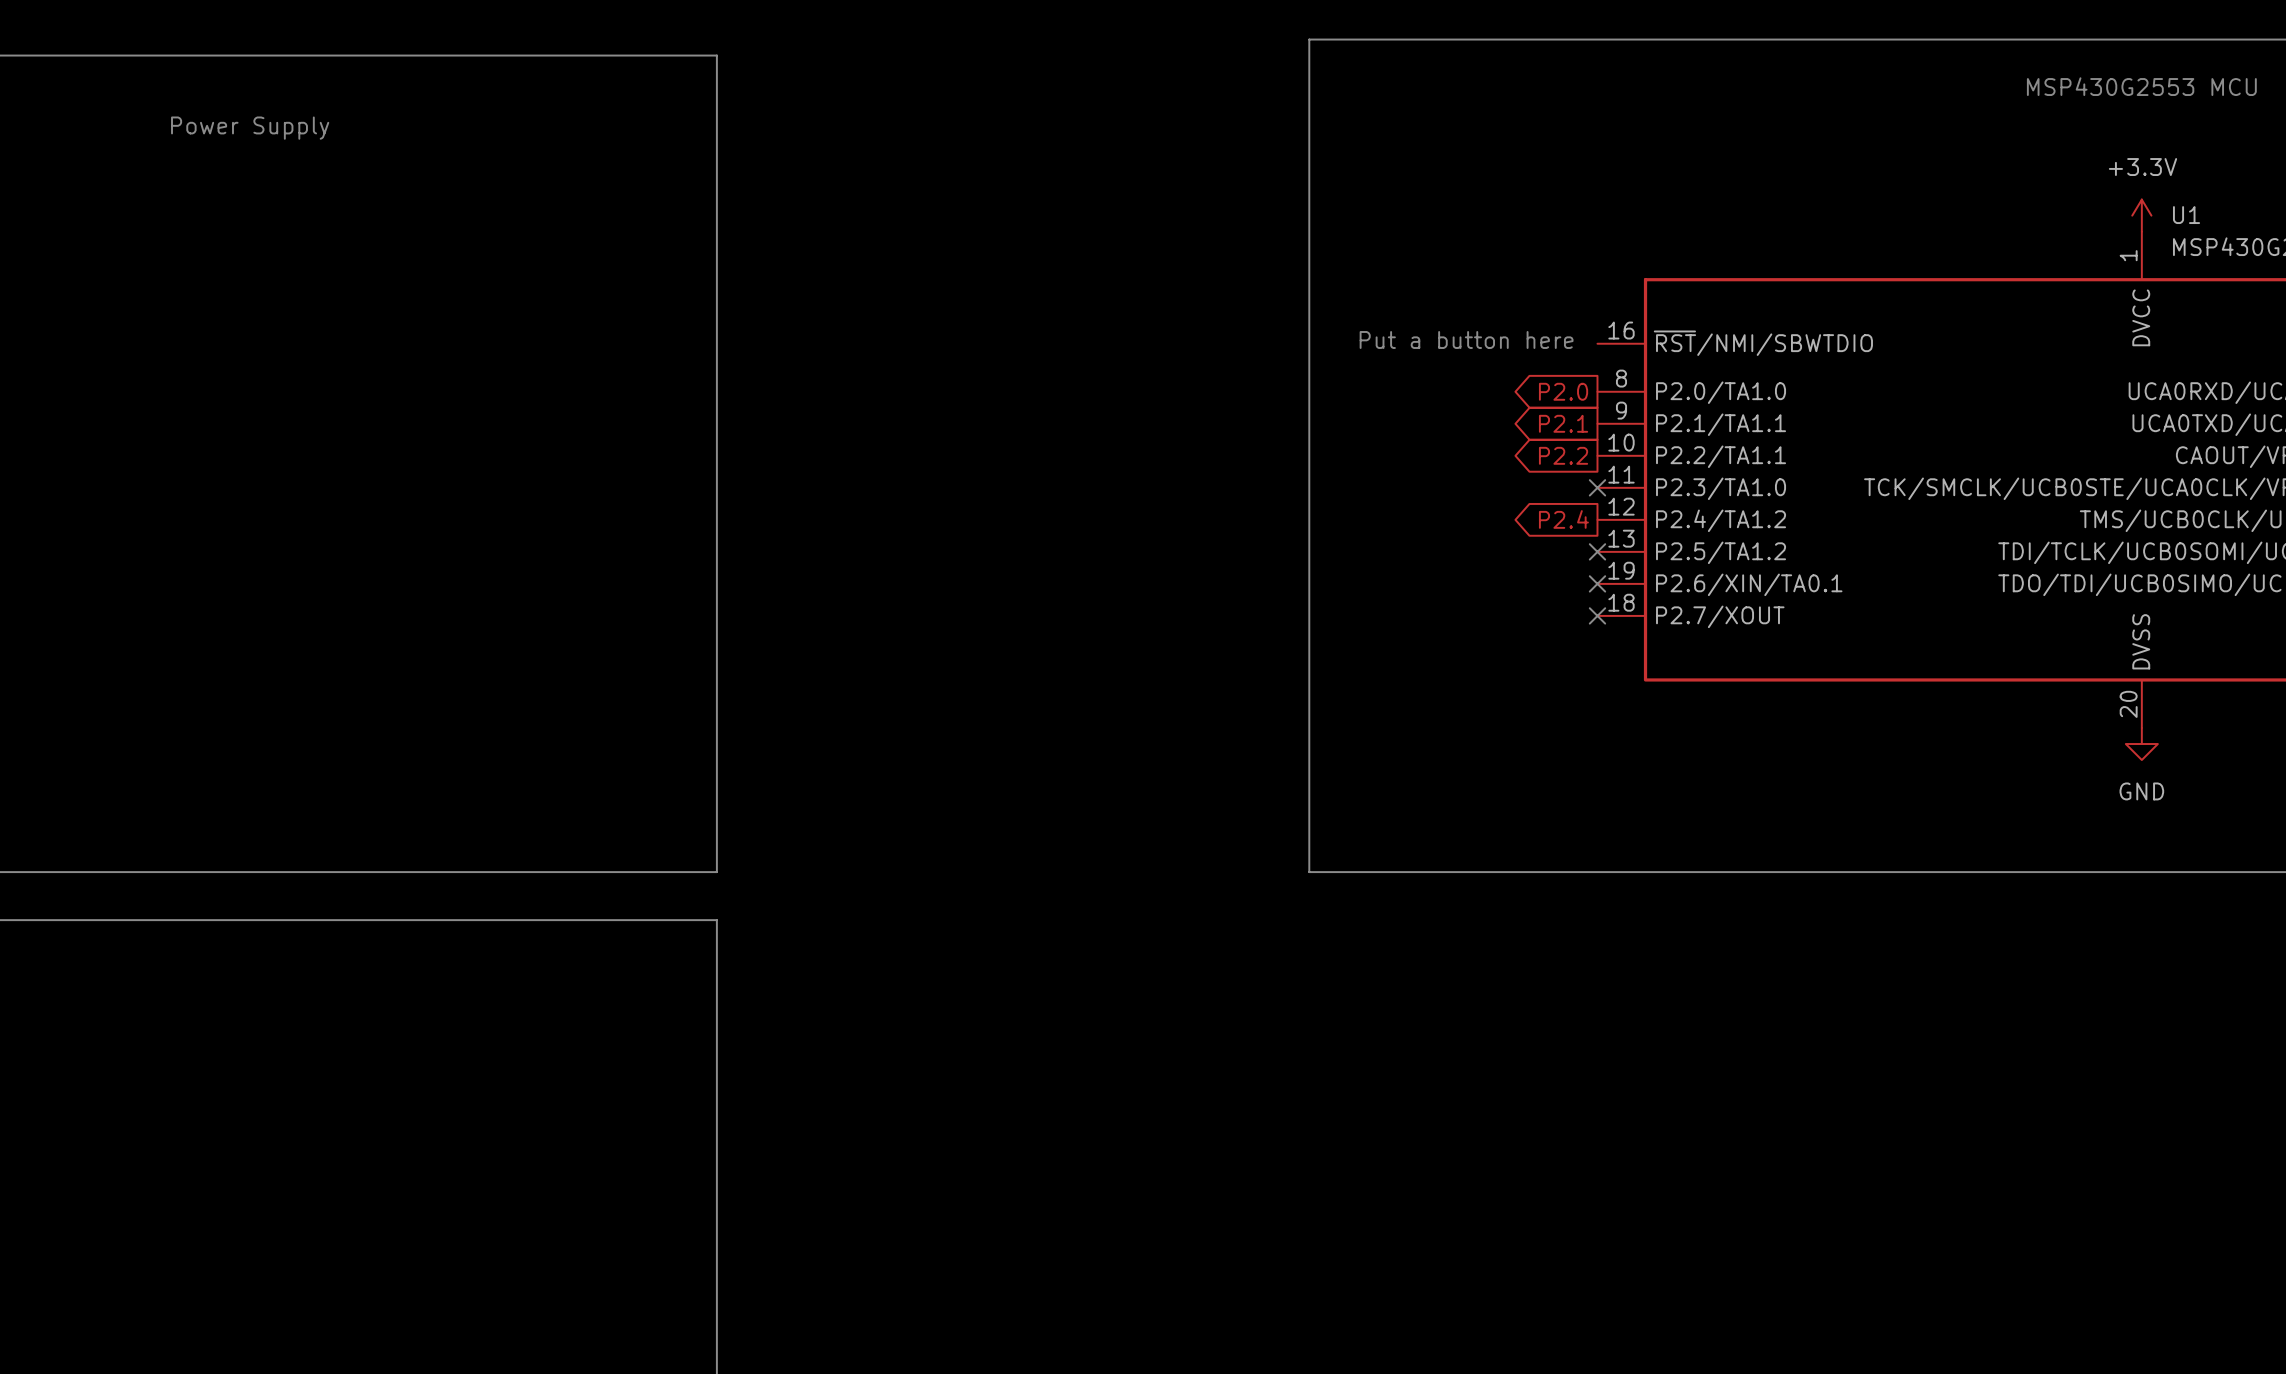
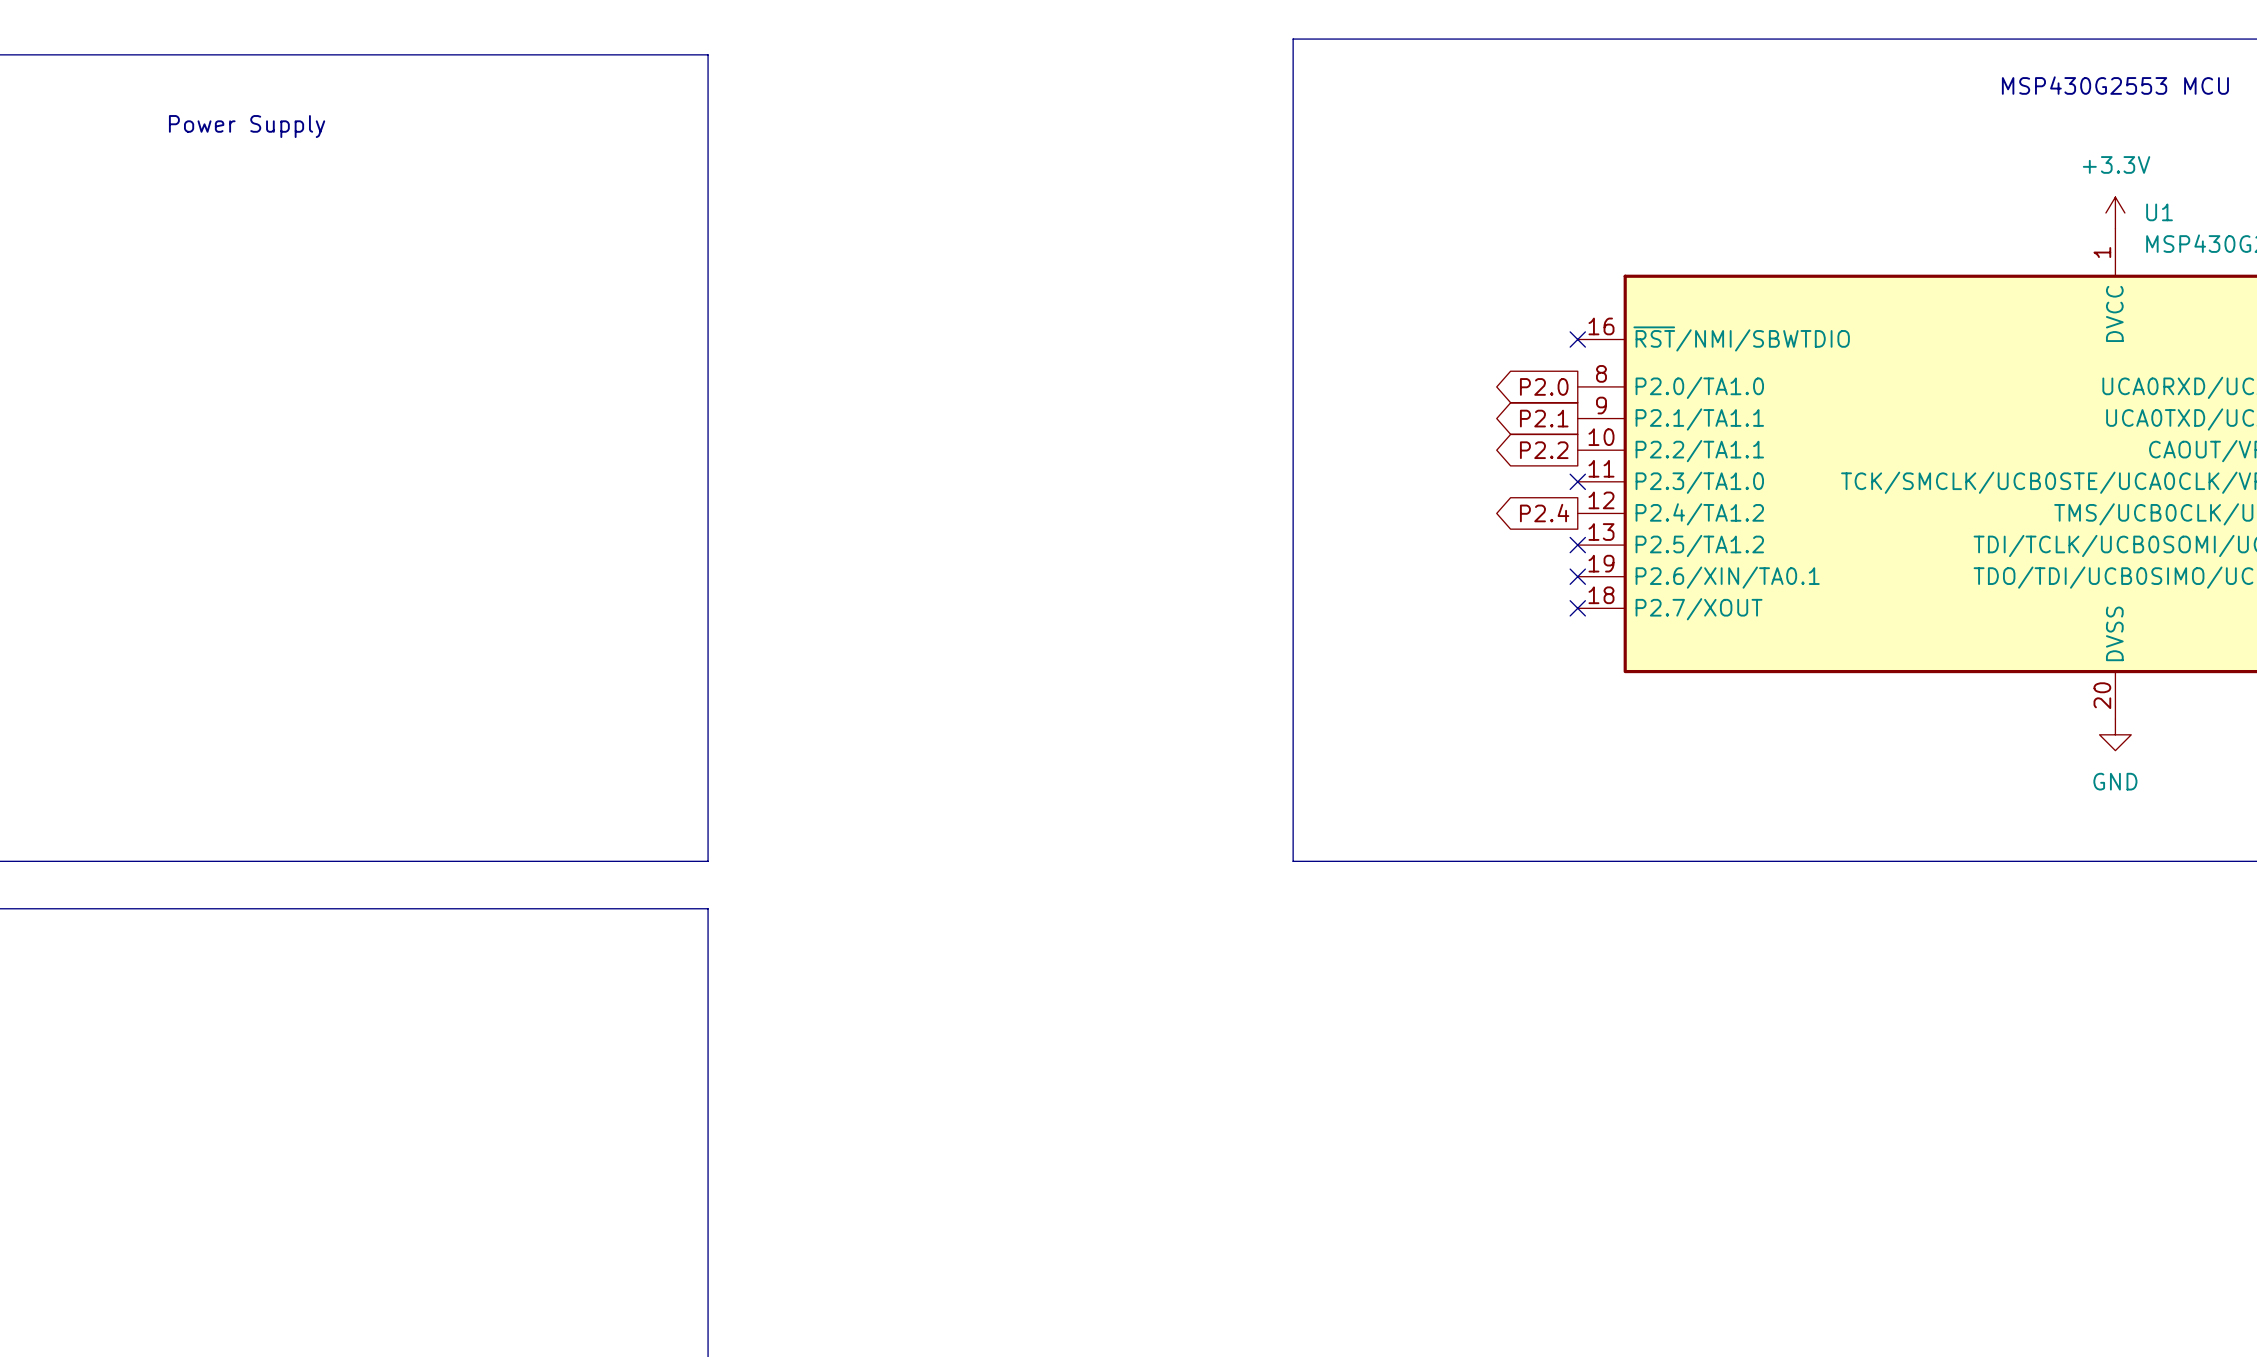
text: Put a button here (1466, 339) -> none
no-connect mark: none -> (1577, 339)

